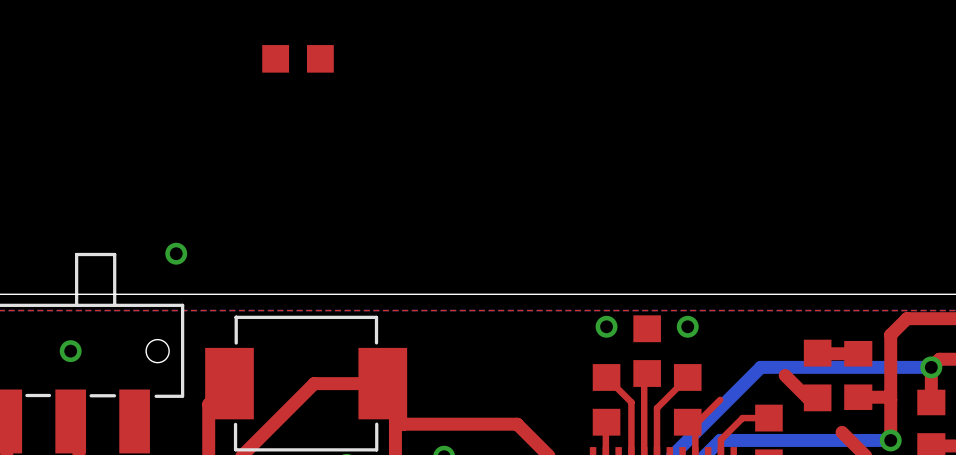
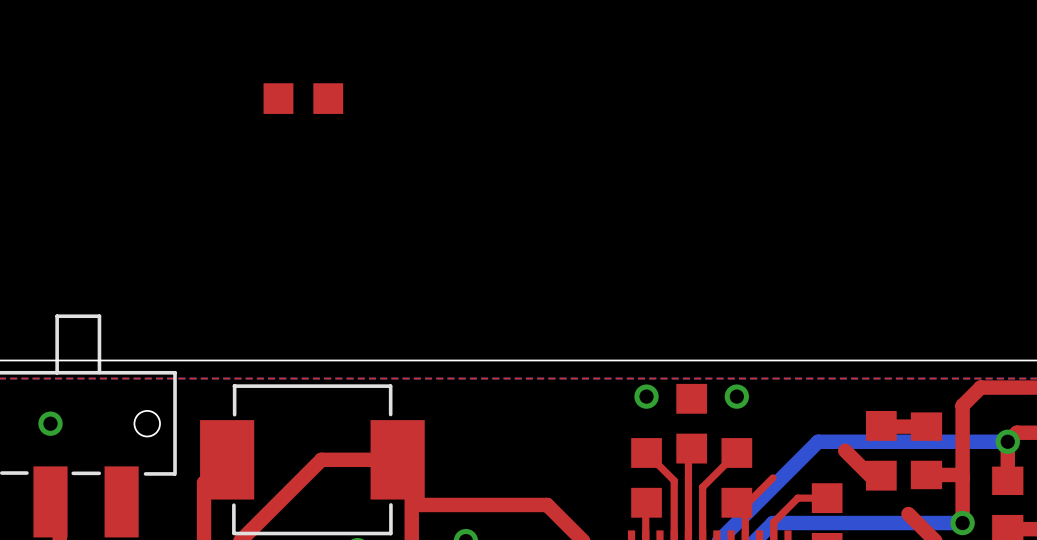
via: (176, 253) -> none

